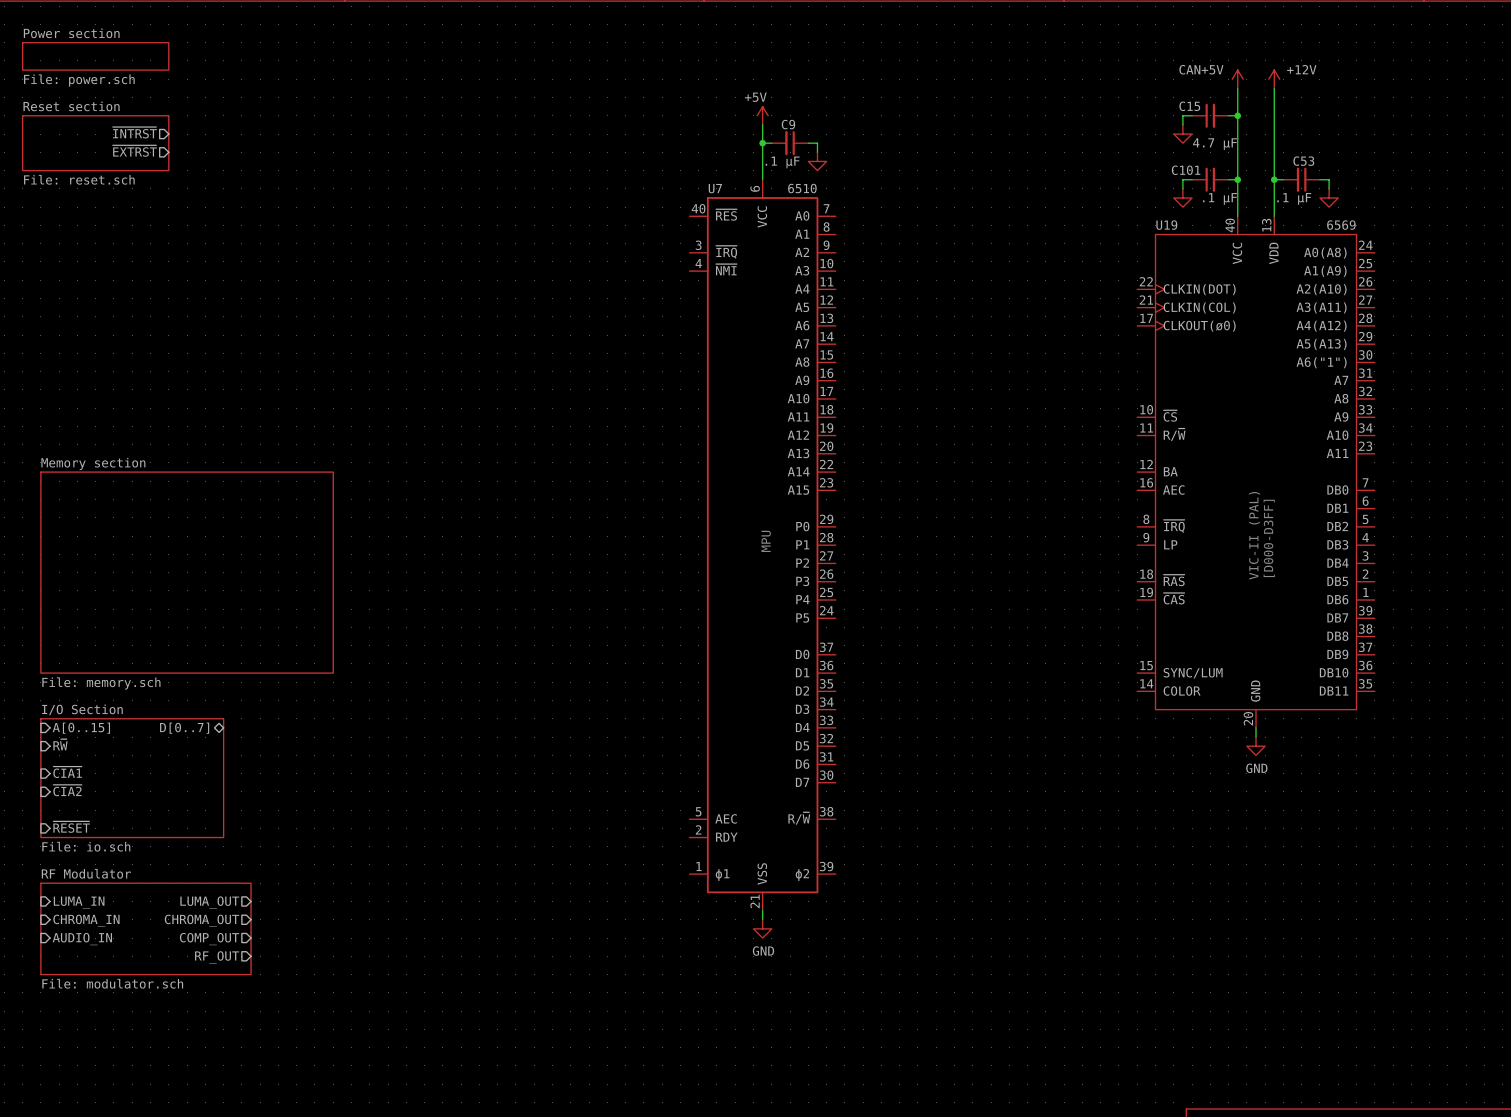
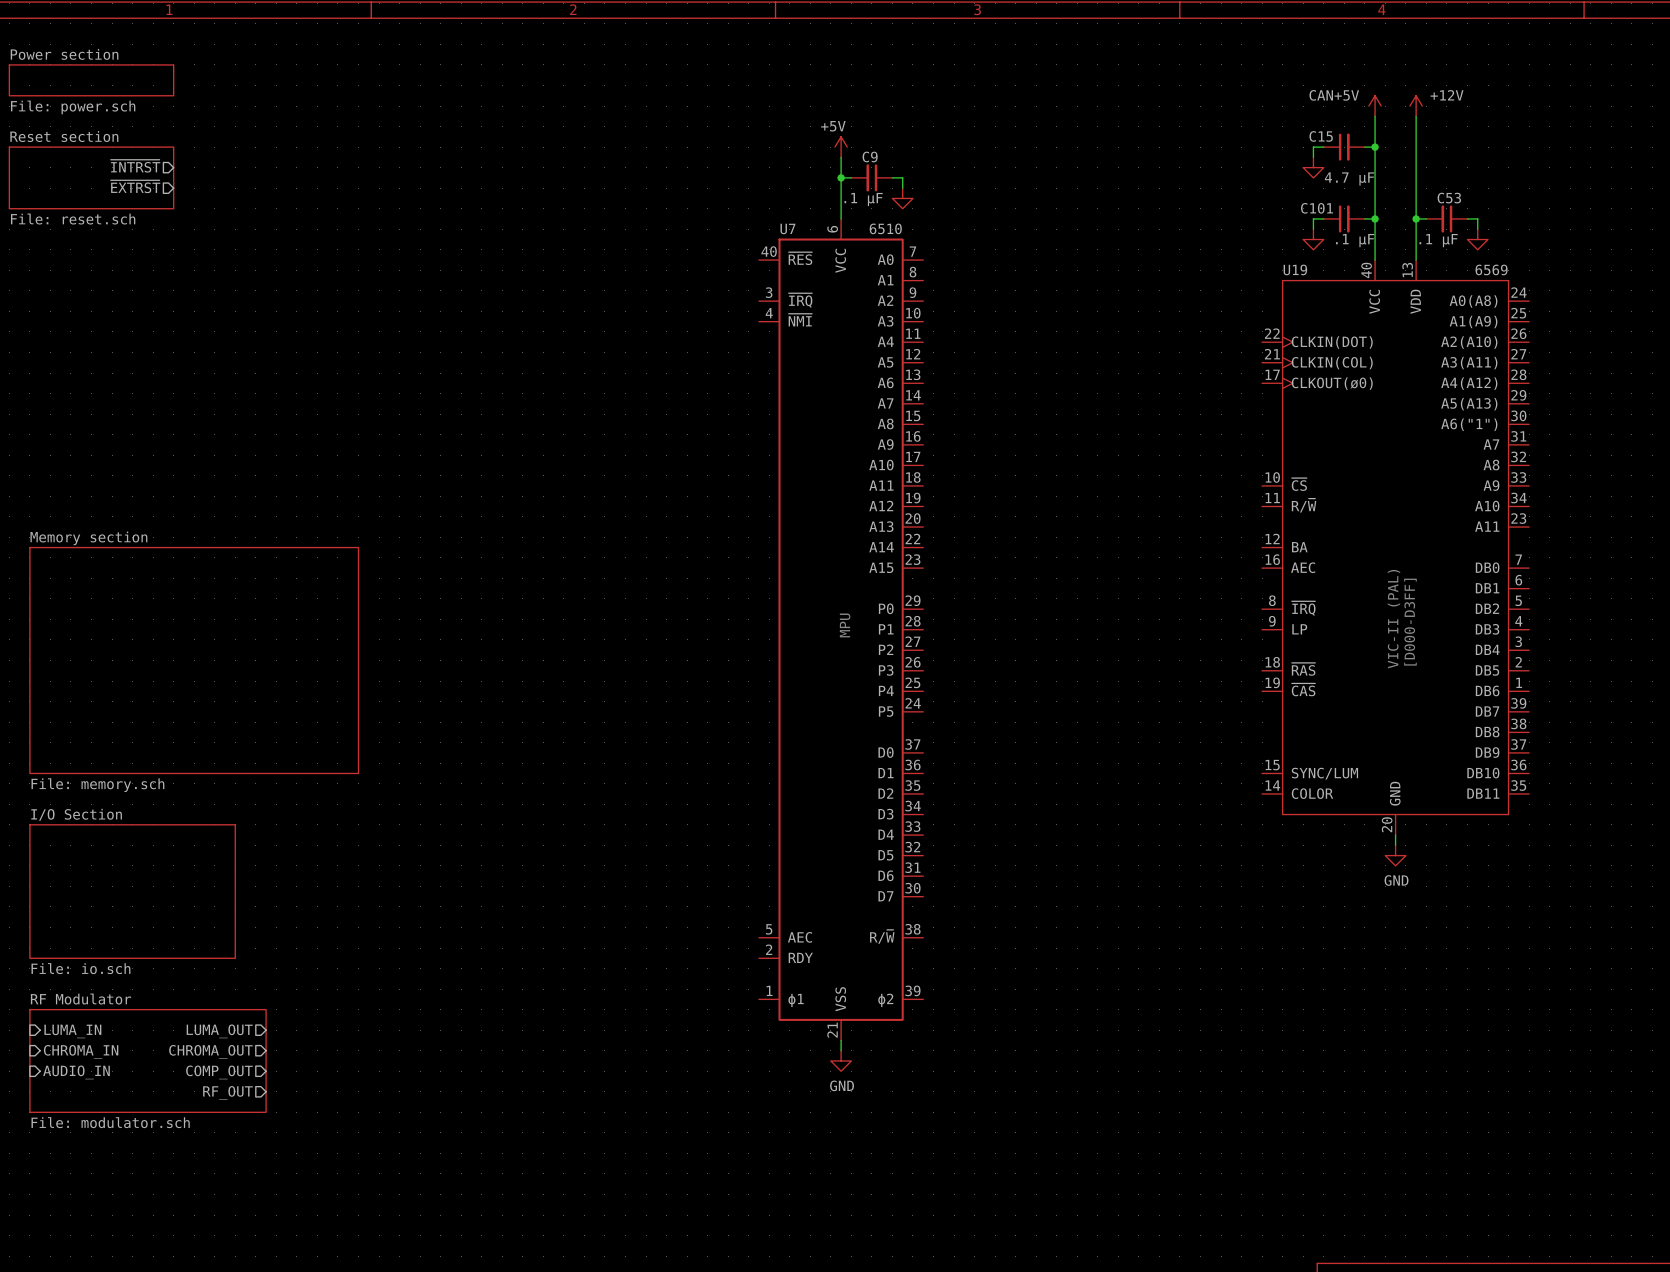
sheet pin: A[0..15] (81, 728) -> none
sheet pin: D[0..7] (184, 728) -> none
sheet pin: R~{W} (60, 744) -> none
sheet pin: ~{CIA1} (67, 772) -> none
sheet pin: ~{CIA2} (67, 790) -> none
sheet pin: ~{RESET} (71, 827) -> none

